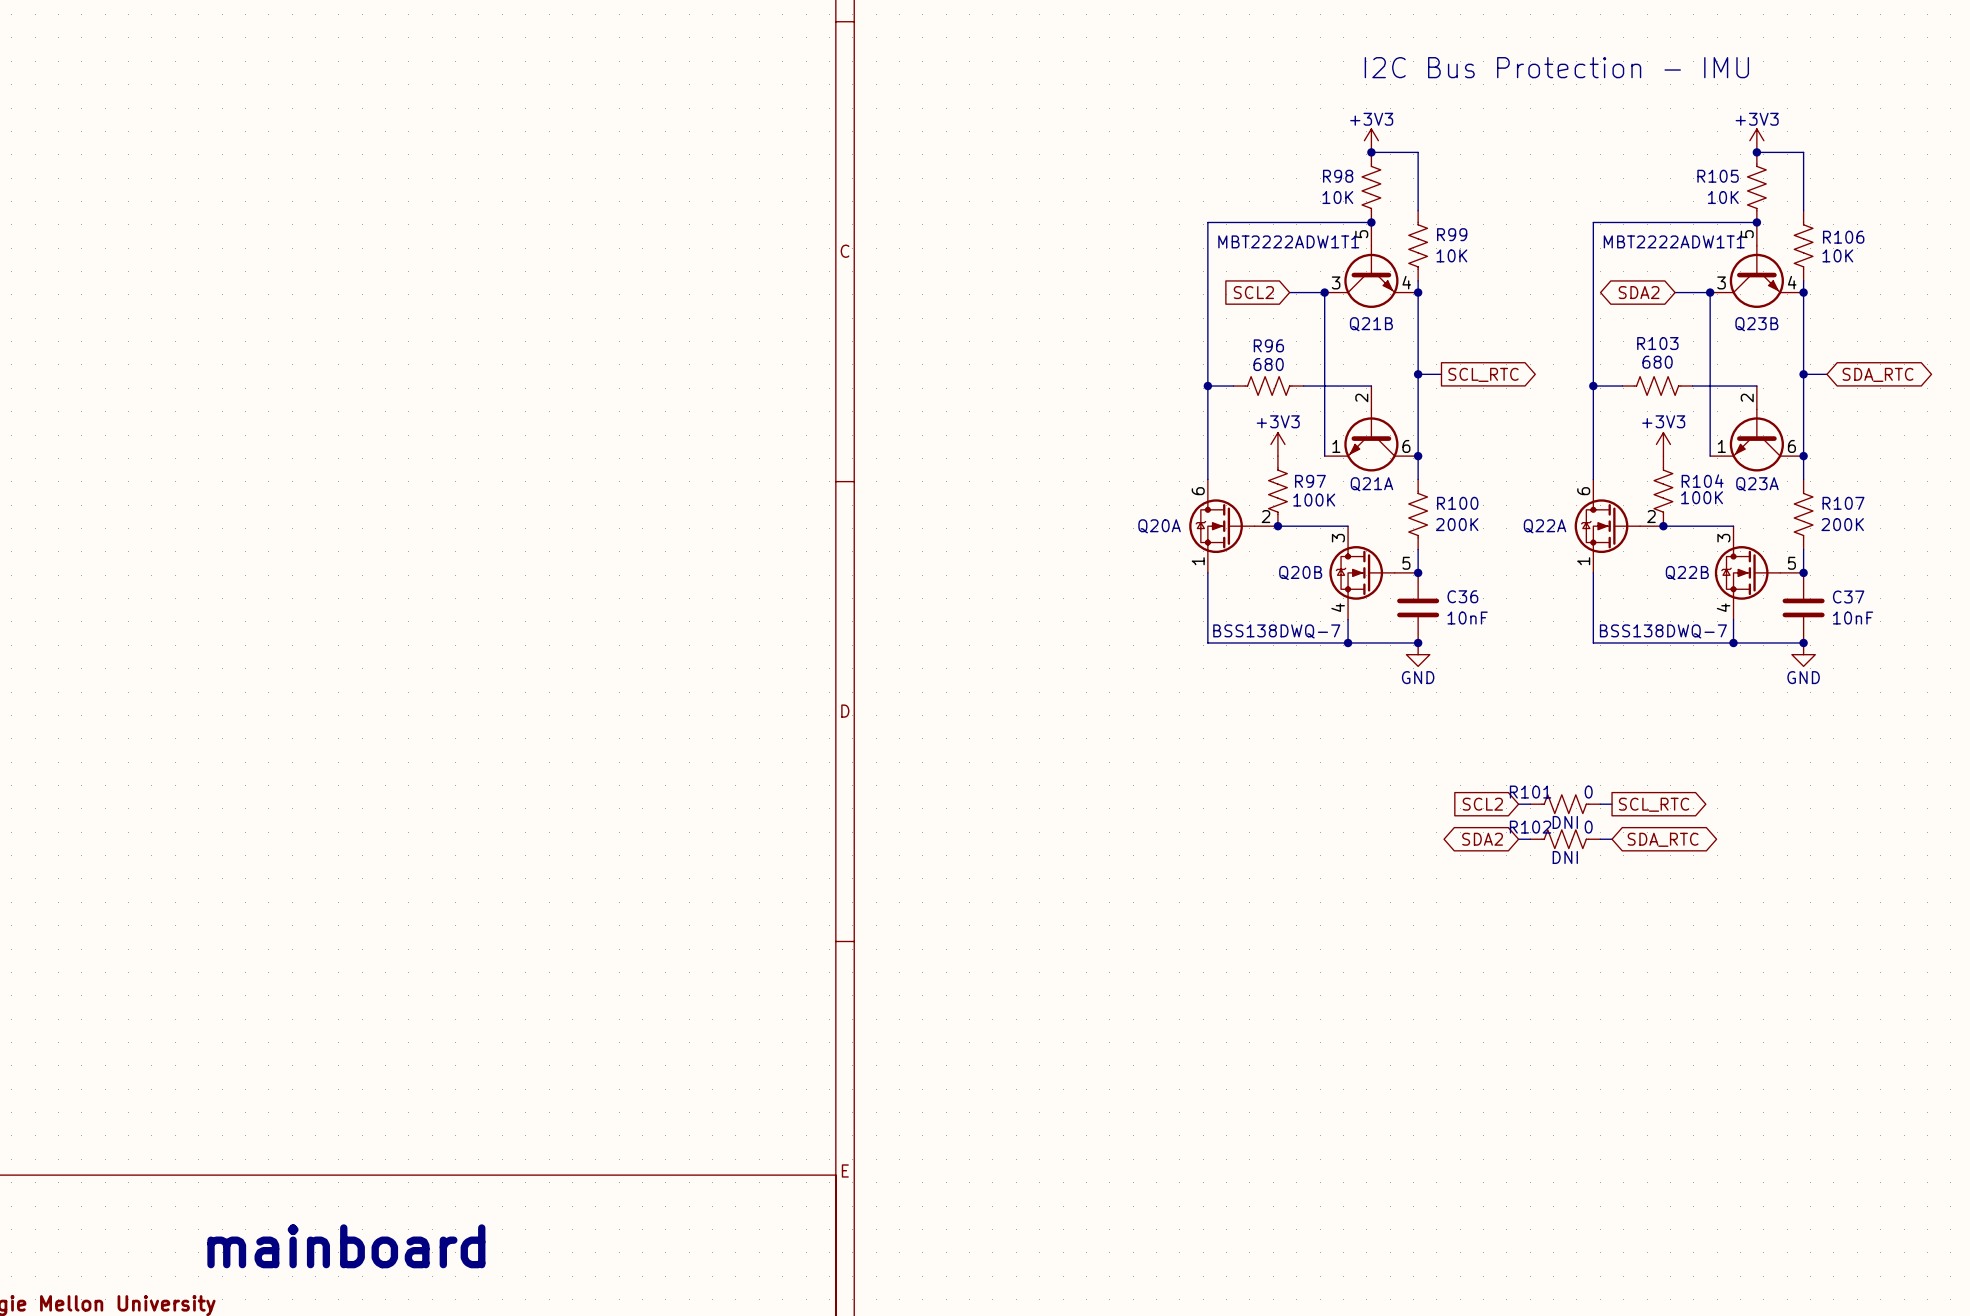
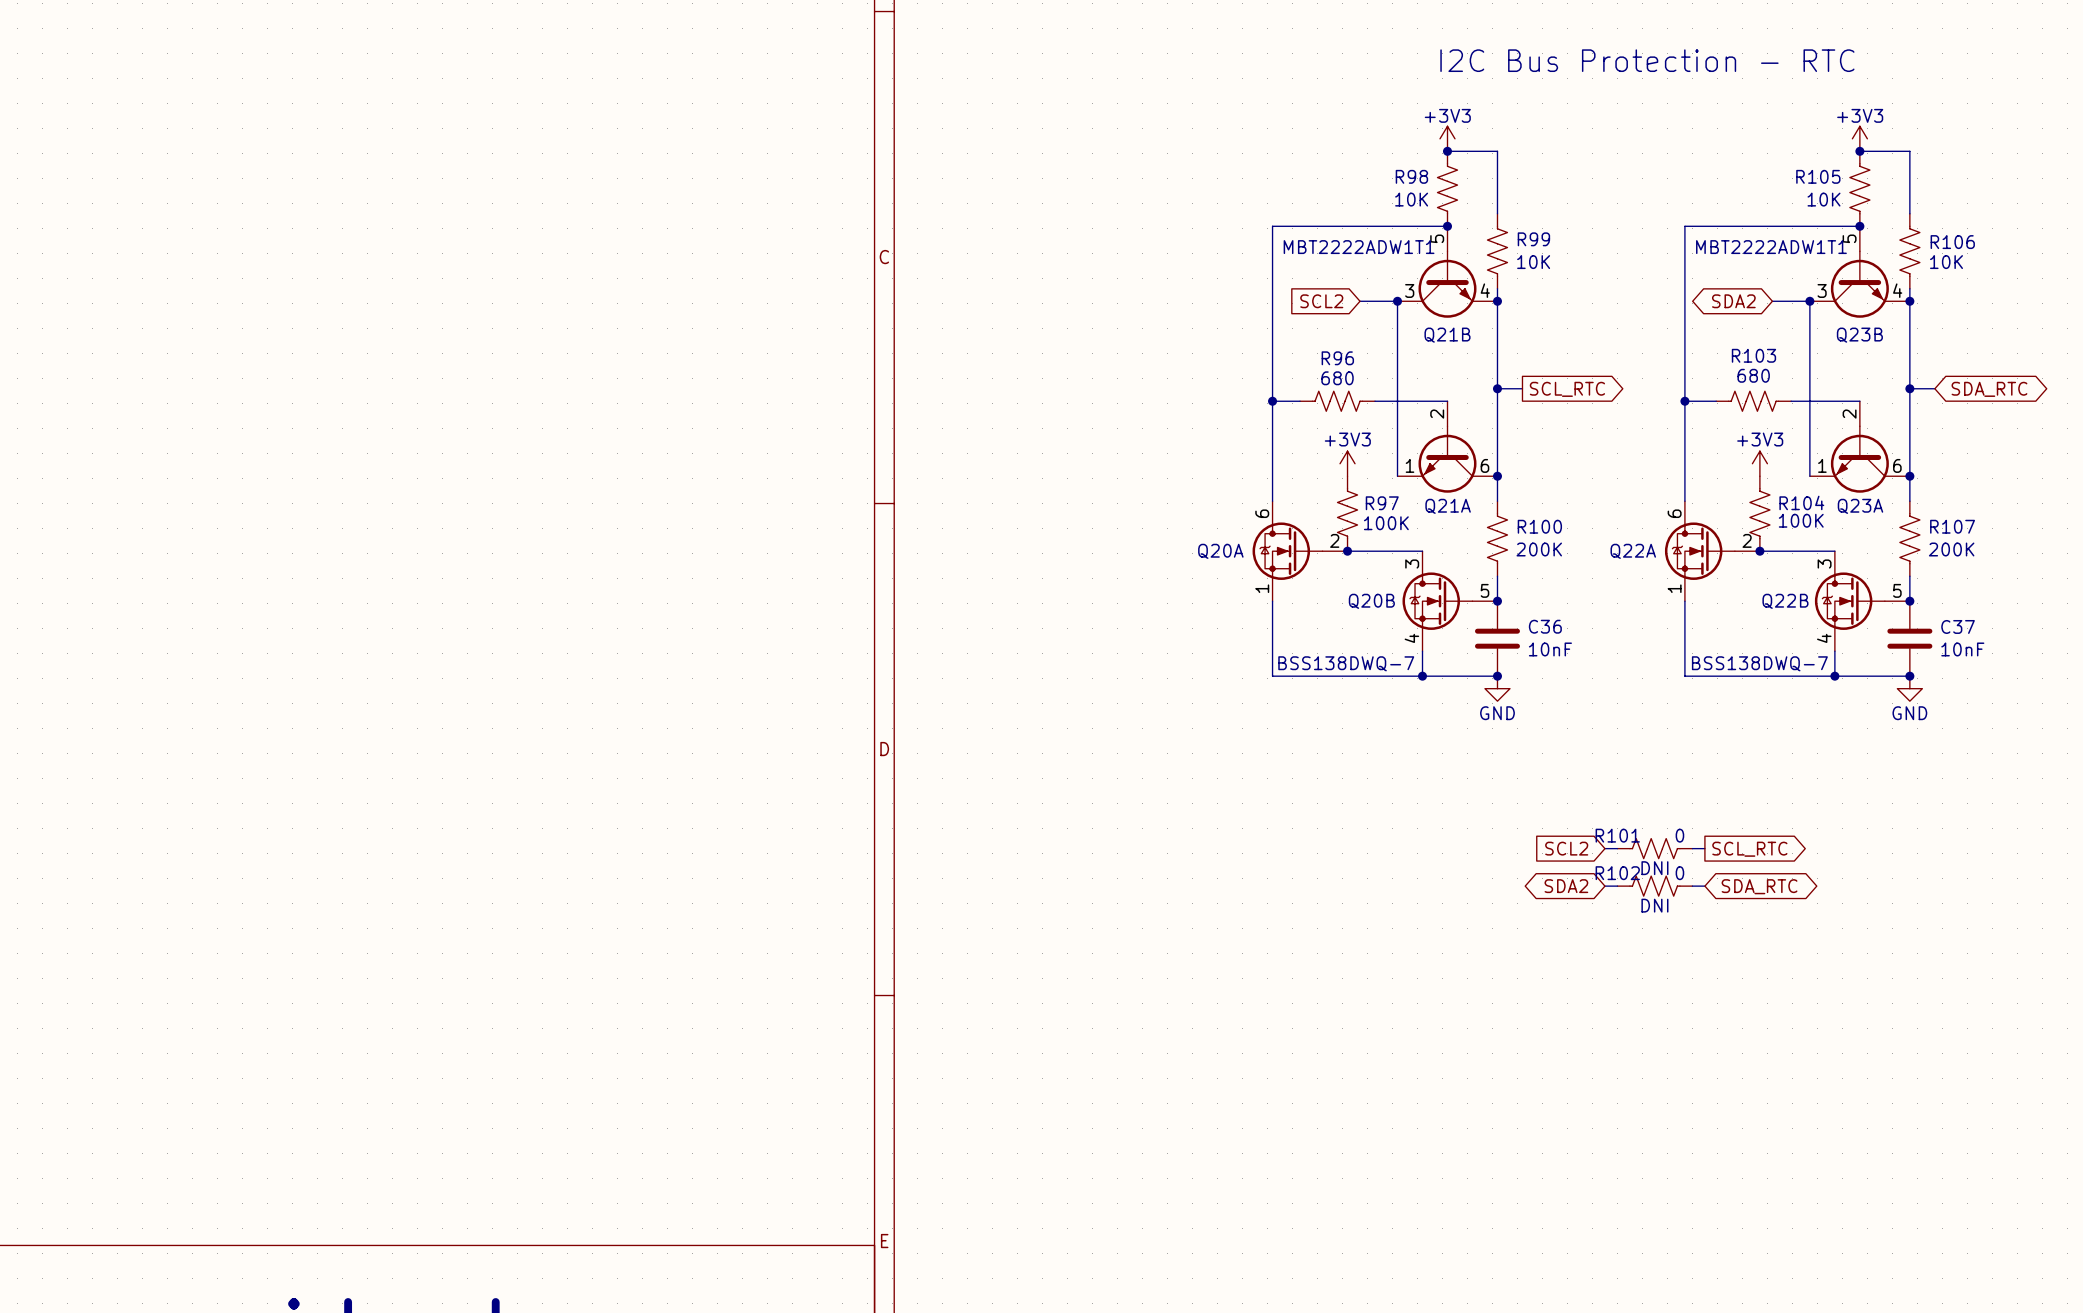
text: I2C Bus Protection - IMU (1556, 67) -> I2C Bus Protection - RTC (1647, 60)

